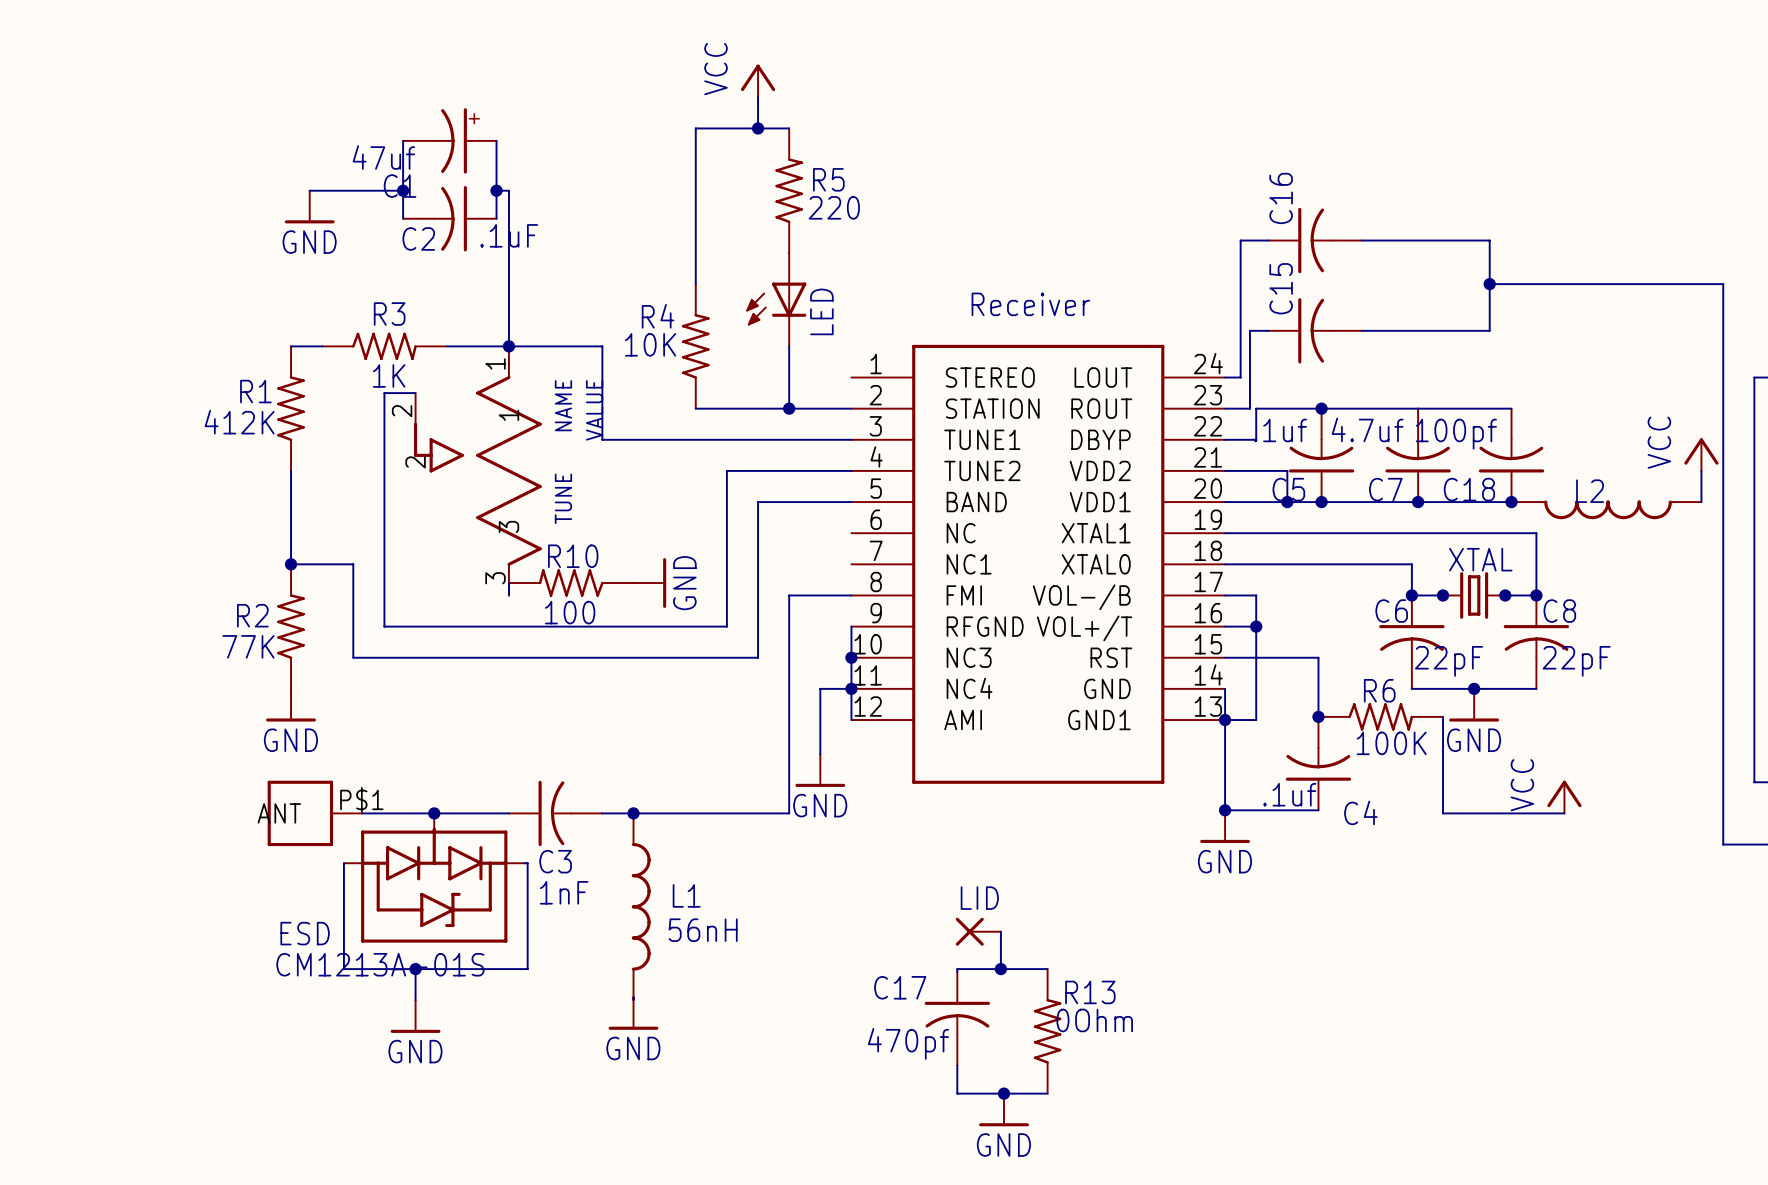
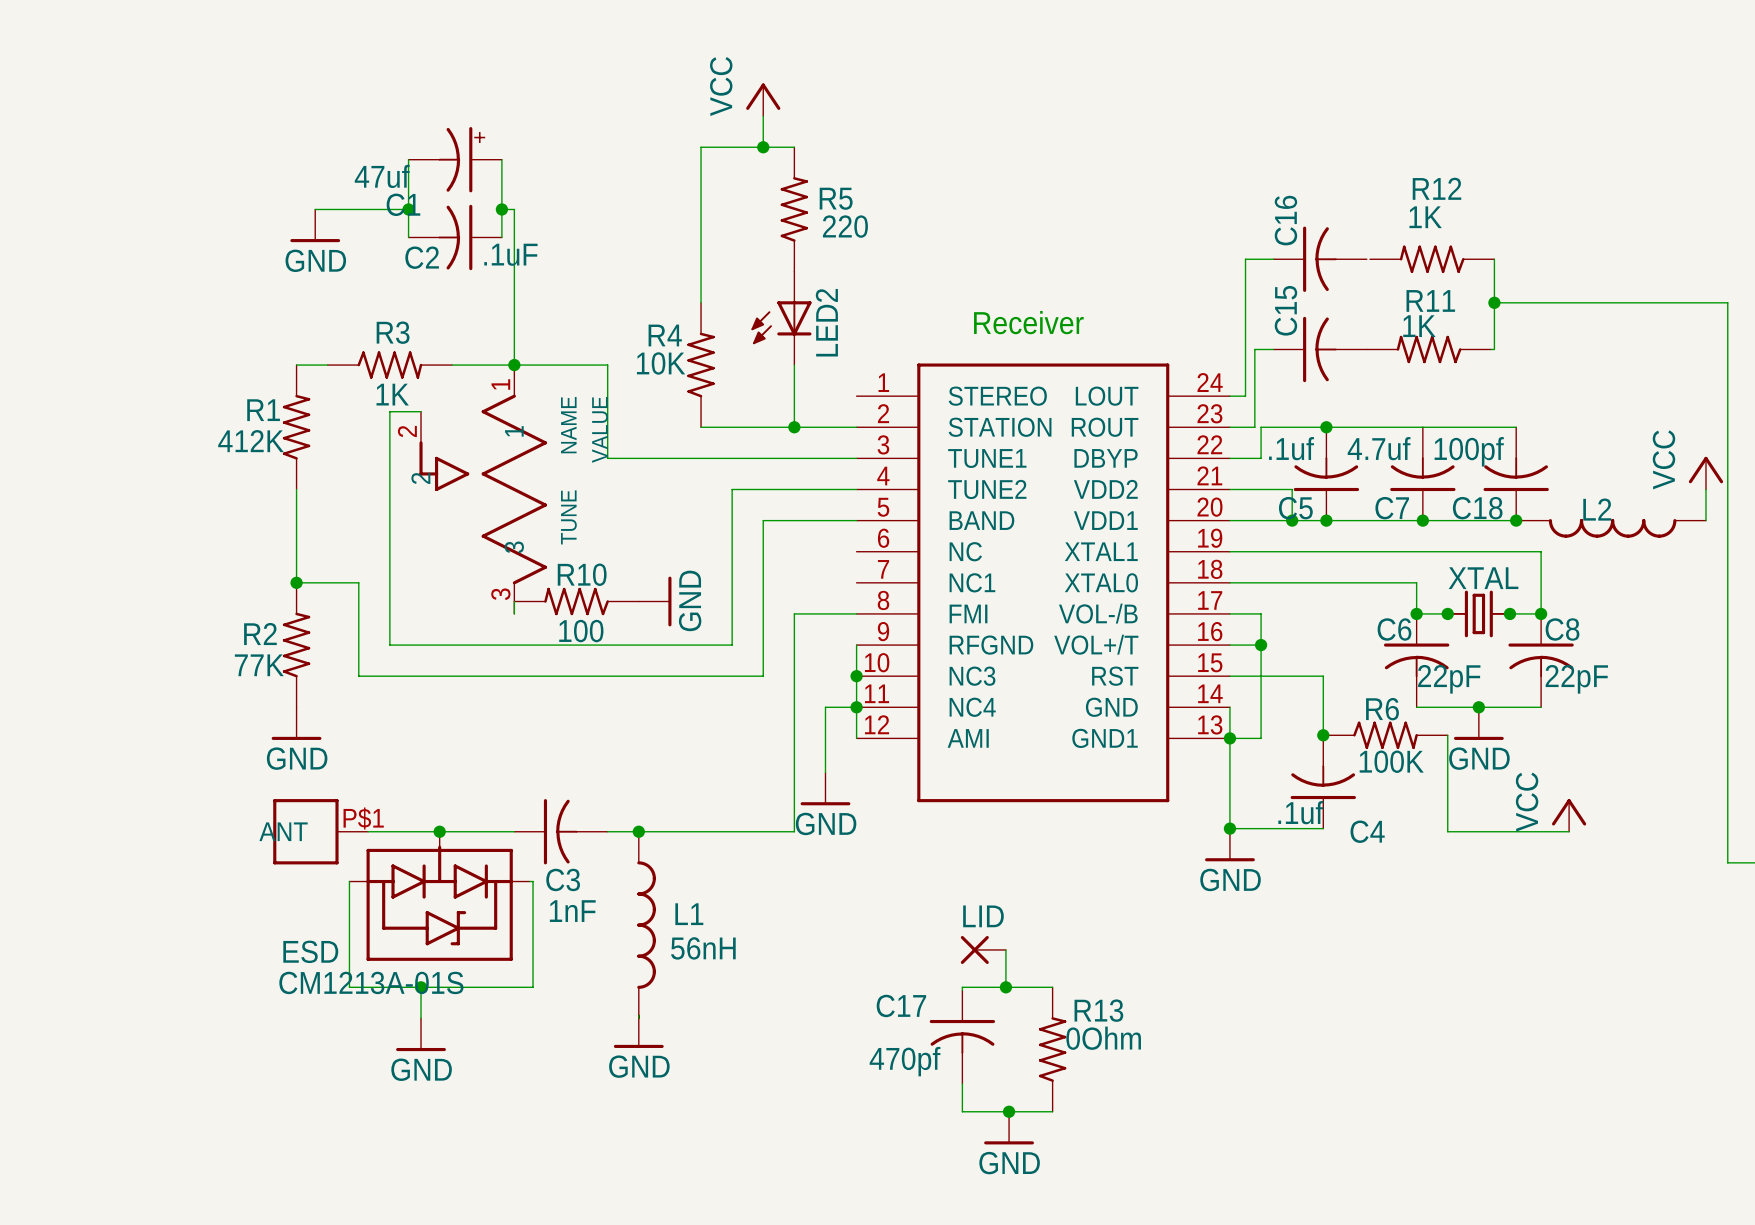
R12: none -> 1K (1432, 259)
LED name: LED (821, 311) -> LED2 (826, 322)
R11: none -> 1K (1429, 349)

